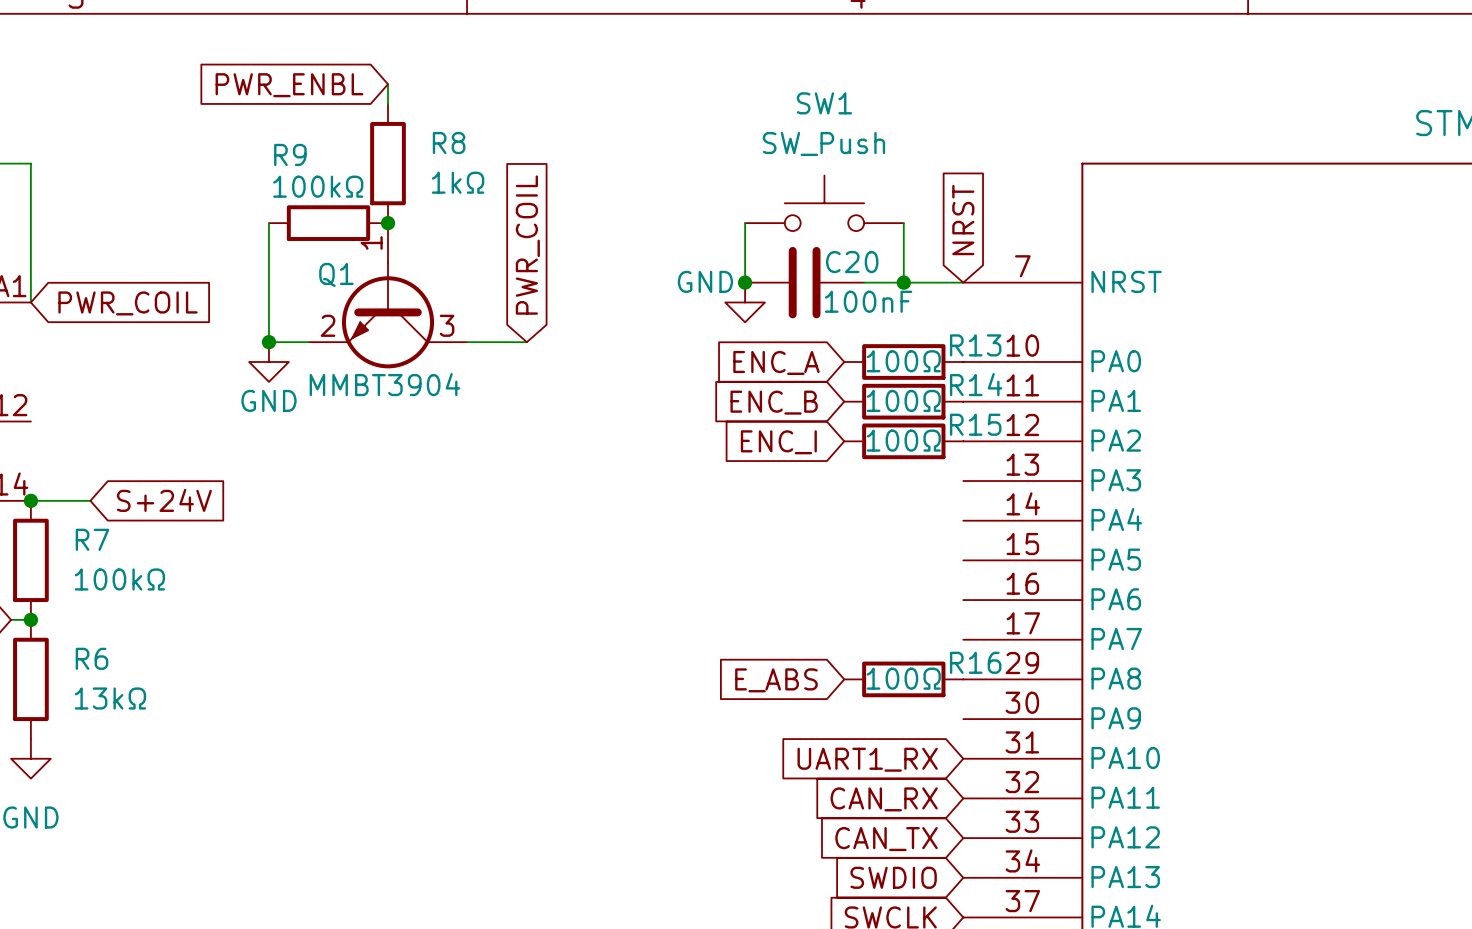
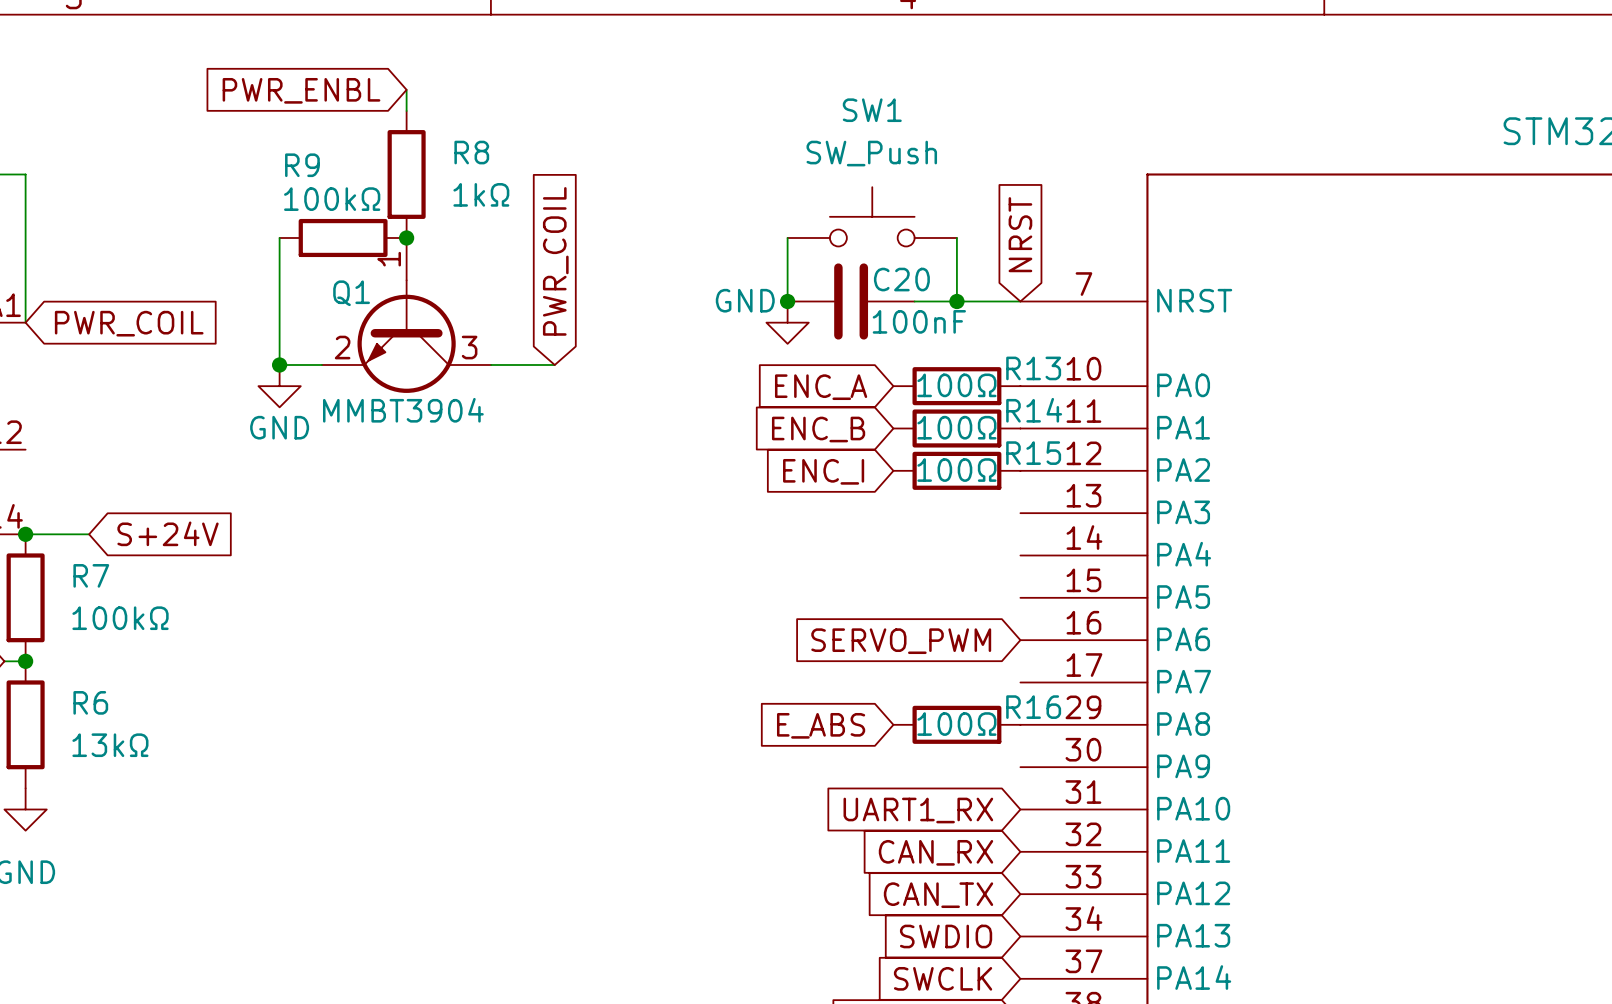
global label: none -> SERVO_PWM (901, 641)

